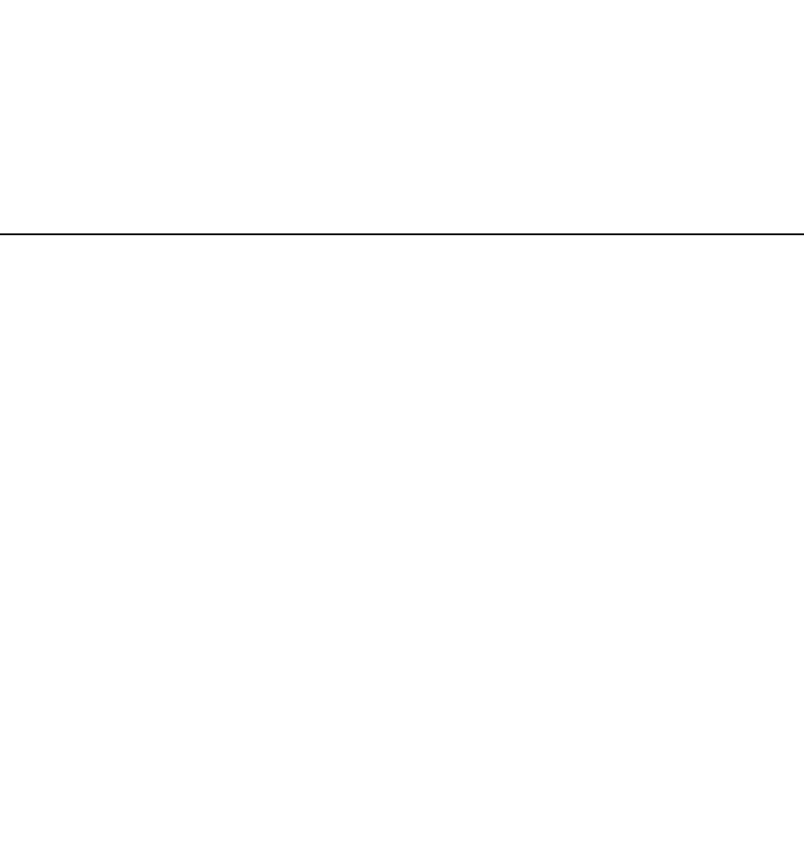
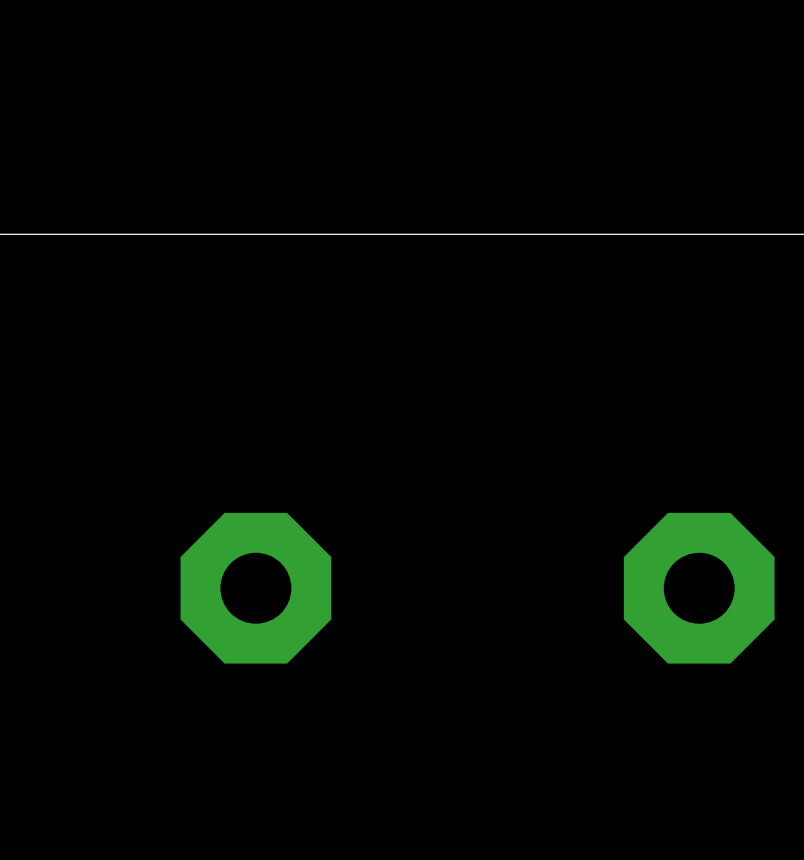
part: none -> (255, 588)
part: none -> (699, 588)

